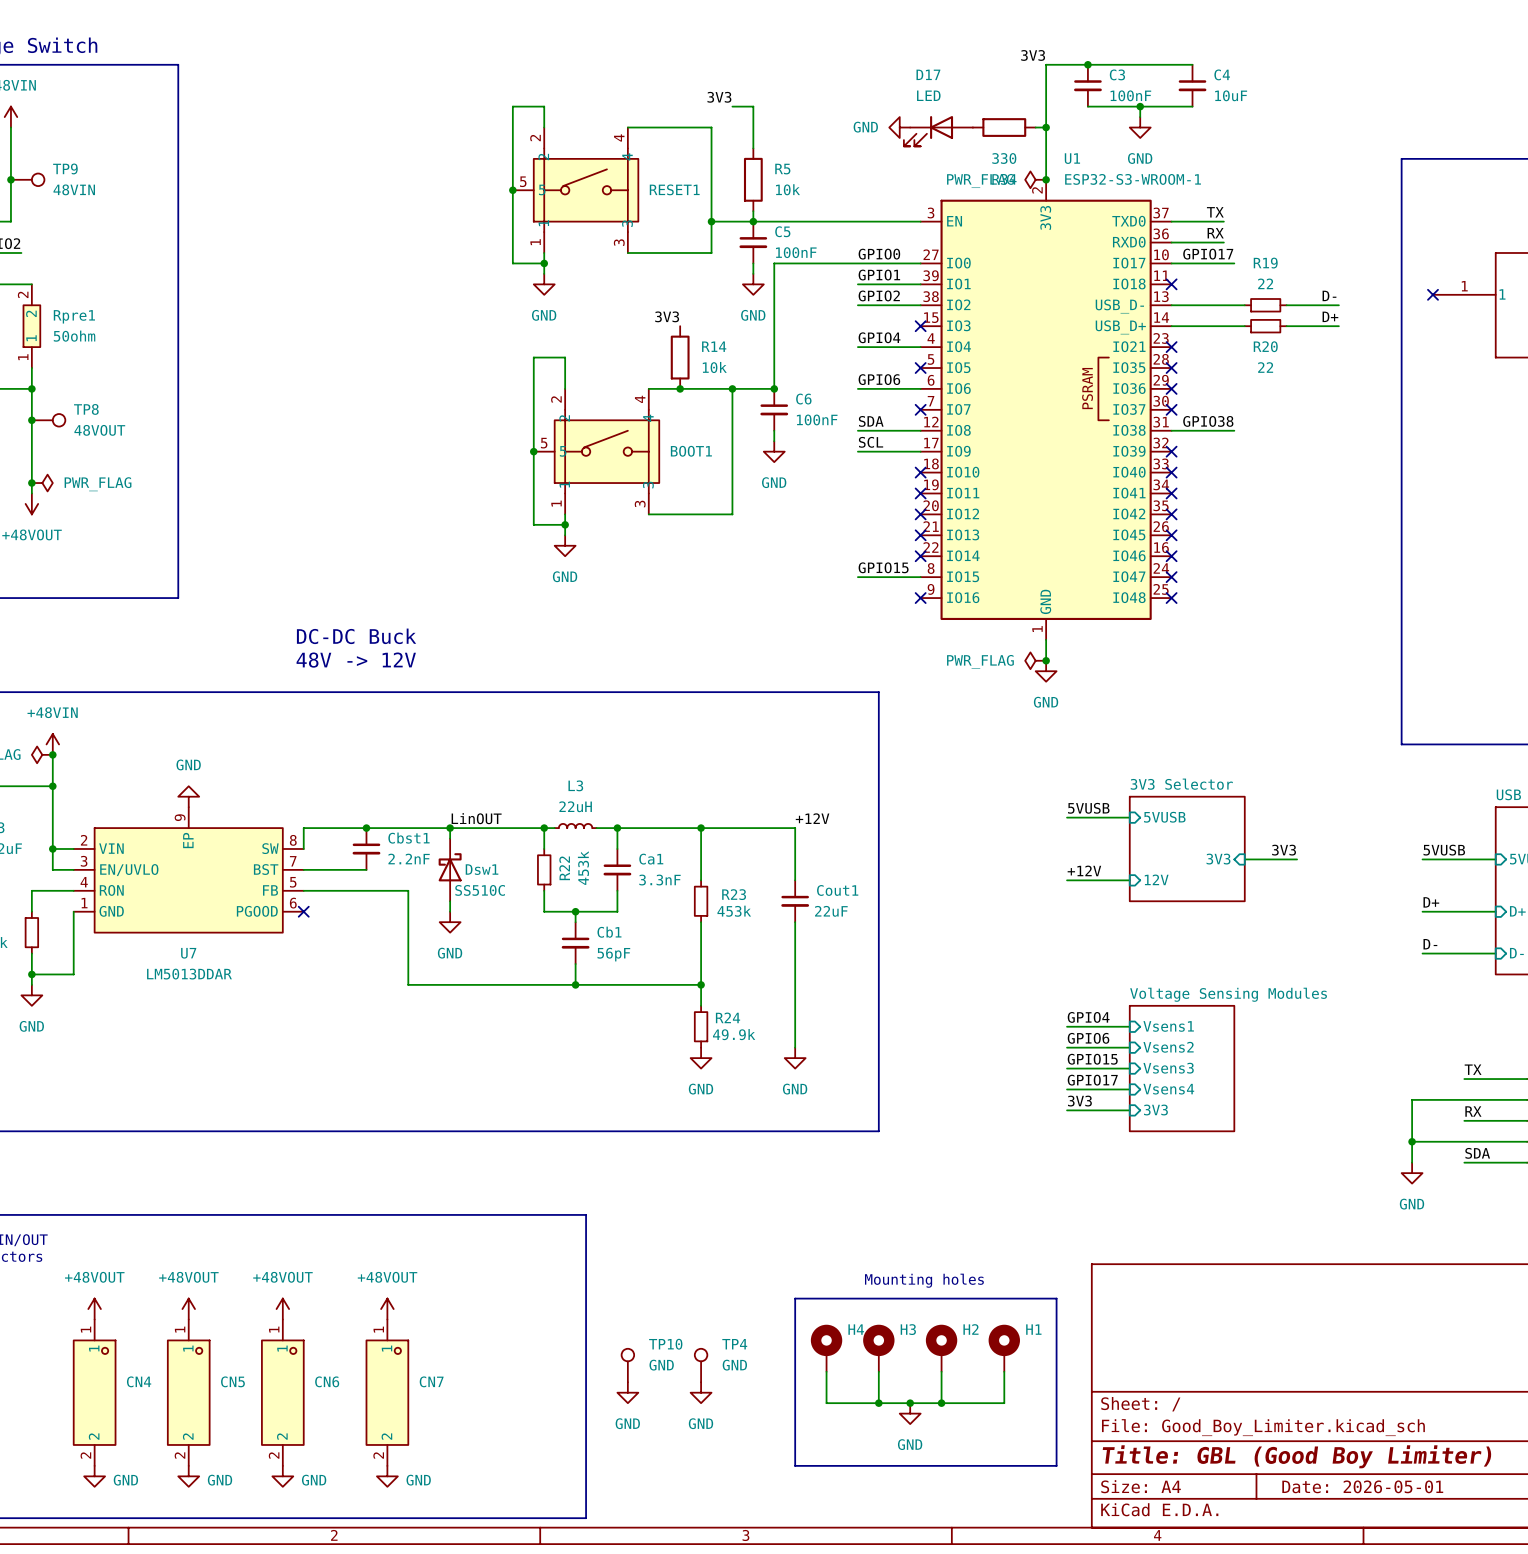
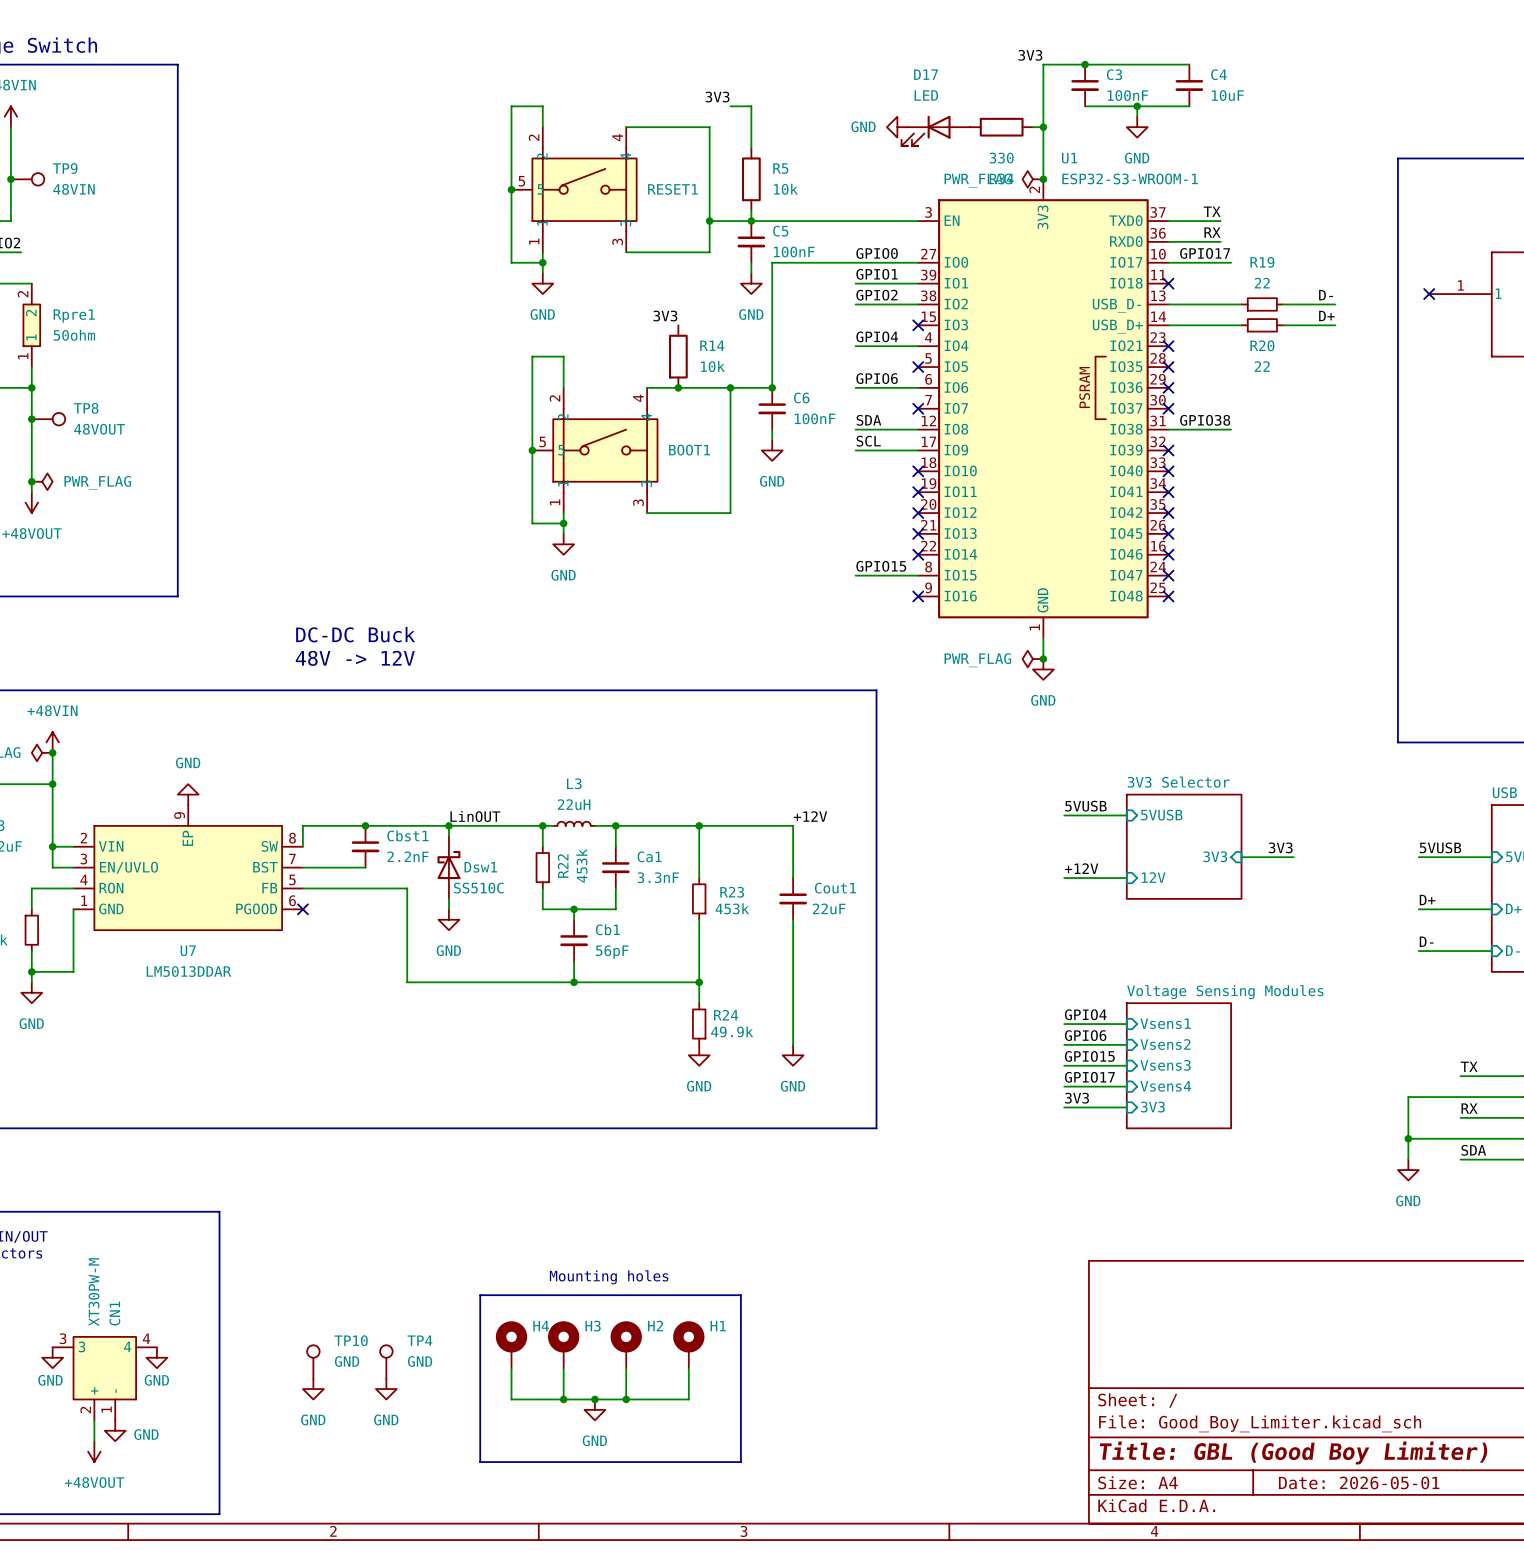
line: (220, 1214) (586, 1214) (586, 1518) (220, 1518) -> (219, 1211) (219, 1514)
text: none -> Mounting holes (609, 1277)
text: Mounting holes (924, 1280) -> none
line: none -> (480, 1295) (740, 1295) (740, 1462) (480, 1462) (480, 1295)
line: (795, 1298) (1056, 1298) (1056, 1465) (795, 1465) (795, 1298) -> none
power symbol: +48VOUT (94, 1309) -> none
power symbol: +48VOUT (188, 1309) -> none
power symbol: +48VOUT (282, 1309) -> none
power symbol: +48VOUT (387, 1309) -> none
H4 position: (826, 1348) -> (511, 1344)
H3 position: (878, 1348) -> (563, 1344)
H2 position: (941, 1348) -> (626, 1344)
H1 position: (1004, 1348) -> (688, 1344)
power symbol: none -> GND (52, 1357)
power symbol: none -> GND (156, 1357)
TP10 position: (627, 1365) -> (313, 1361)
TP4 position: (701, 1365) -> (386, 1361)
wire: none -> (511, 1368) (511, 1399) (688, 1399) (688, 1368)
wire: none -> (563, 1368) (563, 1399)
wire: (826, 1371) (826, 1403) (1004, 1403) (1004, 1371) -> none
wire: (878, 1371) (878, 1403) -> none
wire: (941, 1371) (941, 1403) -> none
CN1: none -> XT30PW-M (104, 1378)
CN4: (94, 1392) -> none
CN5: (188, 1392) -> none
CN6: (282, 1392) -> none
power symbol: none -> GND (313, 1389)
CN7: (387, 1392) -> none
power symbol: none -> GND (386, 1389)
power symbol position: GND (627, 1392) -> GND (594, 1409)
power symbol: GND (701, 1392) -> none
junction: none -> (563, 1399)
junction: none -> (594, 1399)
junction: none -> (626, 1399)
junction: (878, 1403) -> none
junction: (910, 1403) -> none
junction: (941, 1403) -> none
power symbol: GND (910, 1413) -> none
power symbol: none -> GND (115, 1430)
power symbol: none -> +48VOUT (94, 1451)
power symbol: GND (94, 1476) -> none
power symbol: GND (188, 1476) -> none
power symbol: GND (282, 1476) -> none
power symbol: GND (387, 1476) -> none

